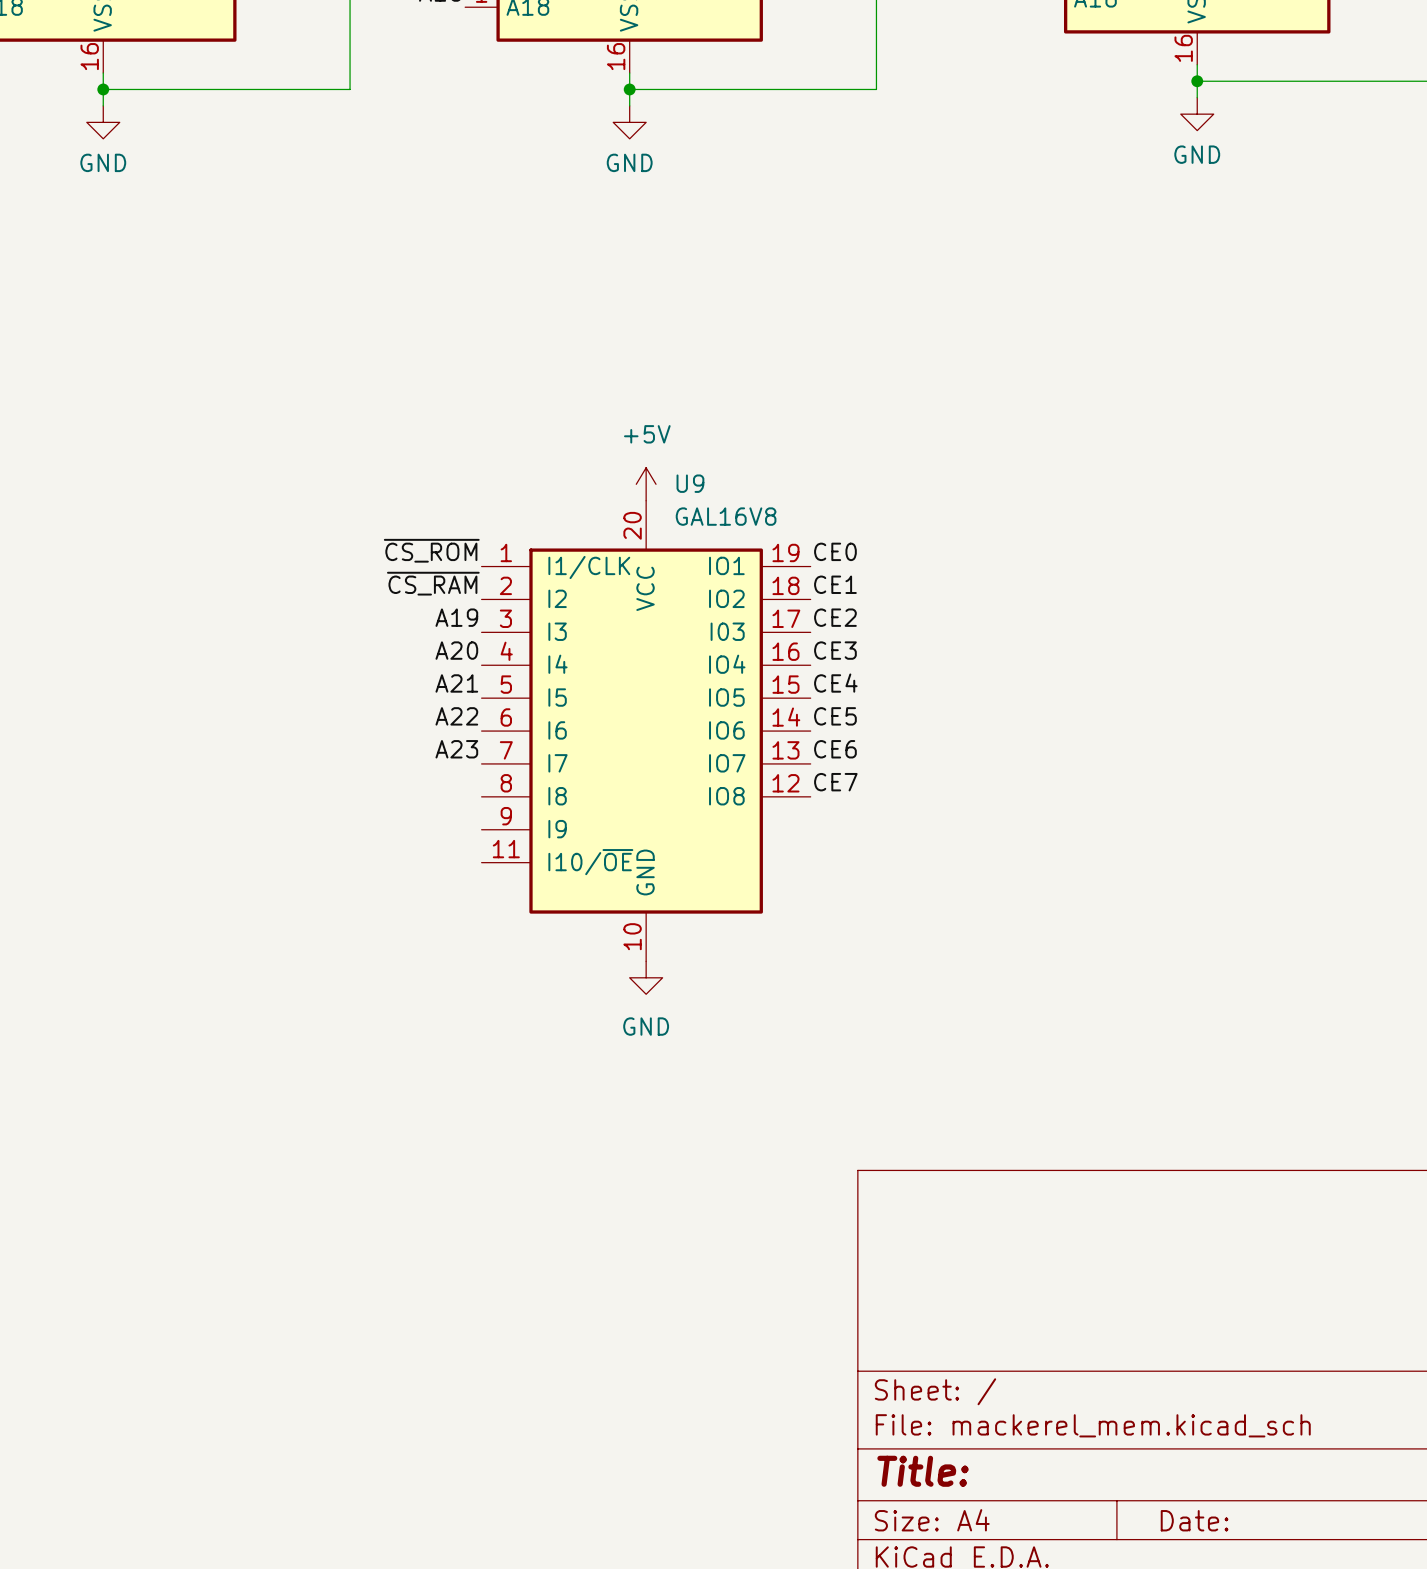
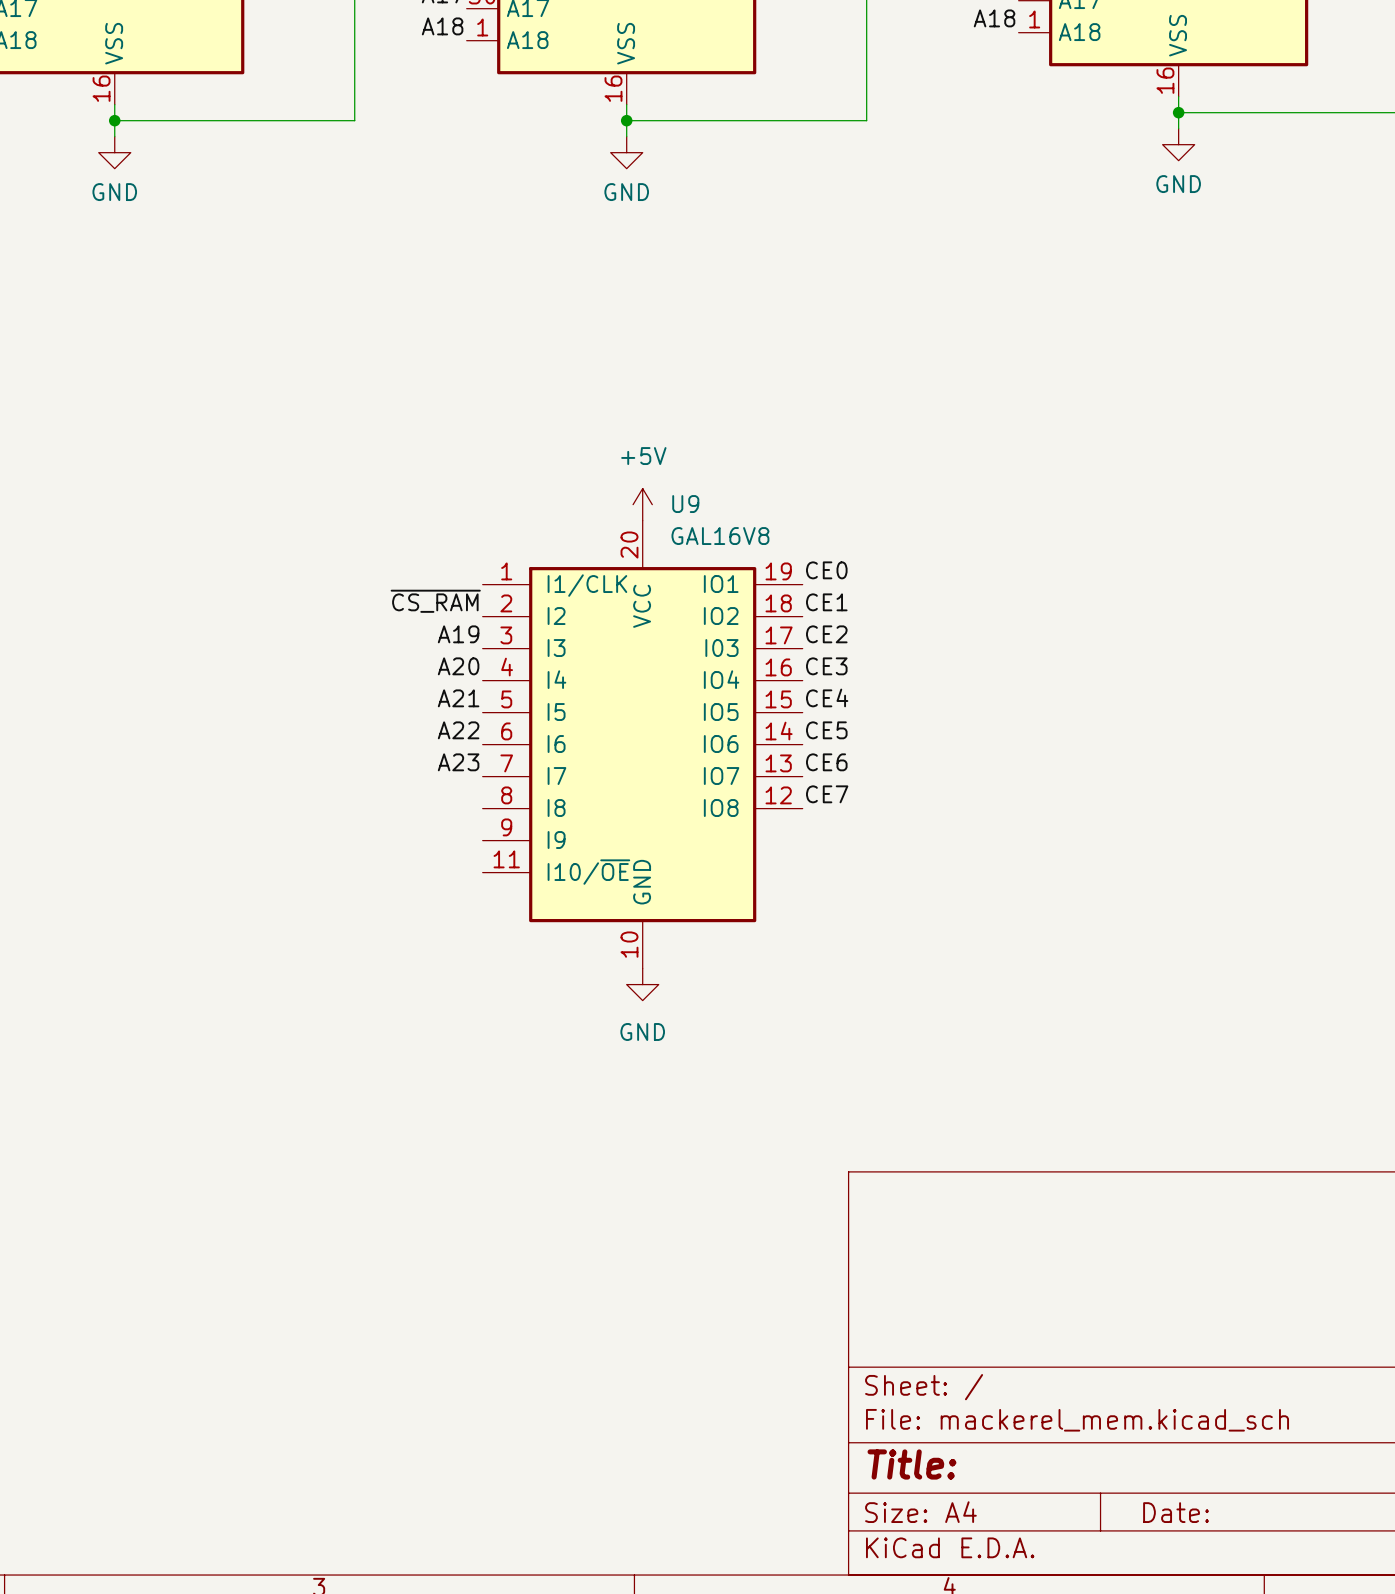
label: ~{CS_ROM} (431, 550) -> none

